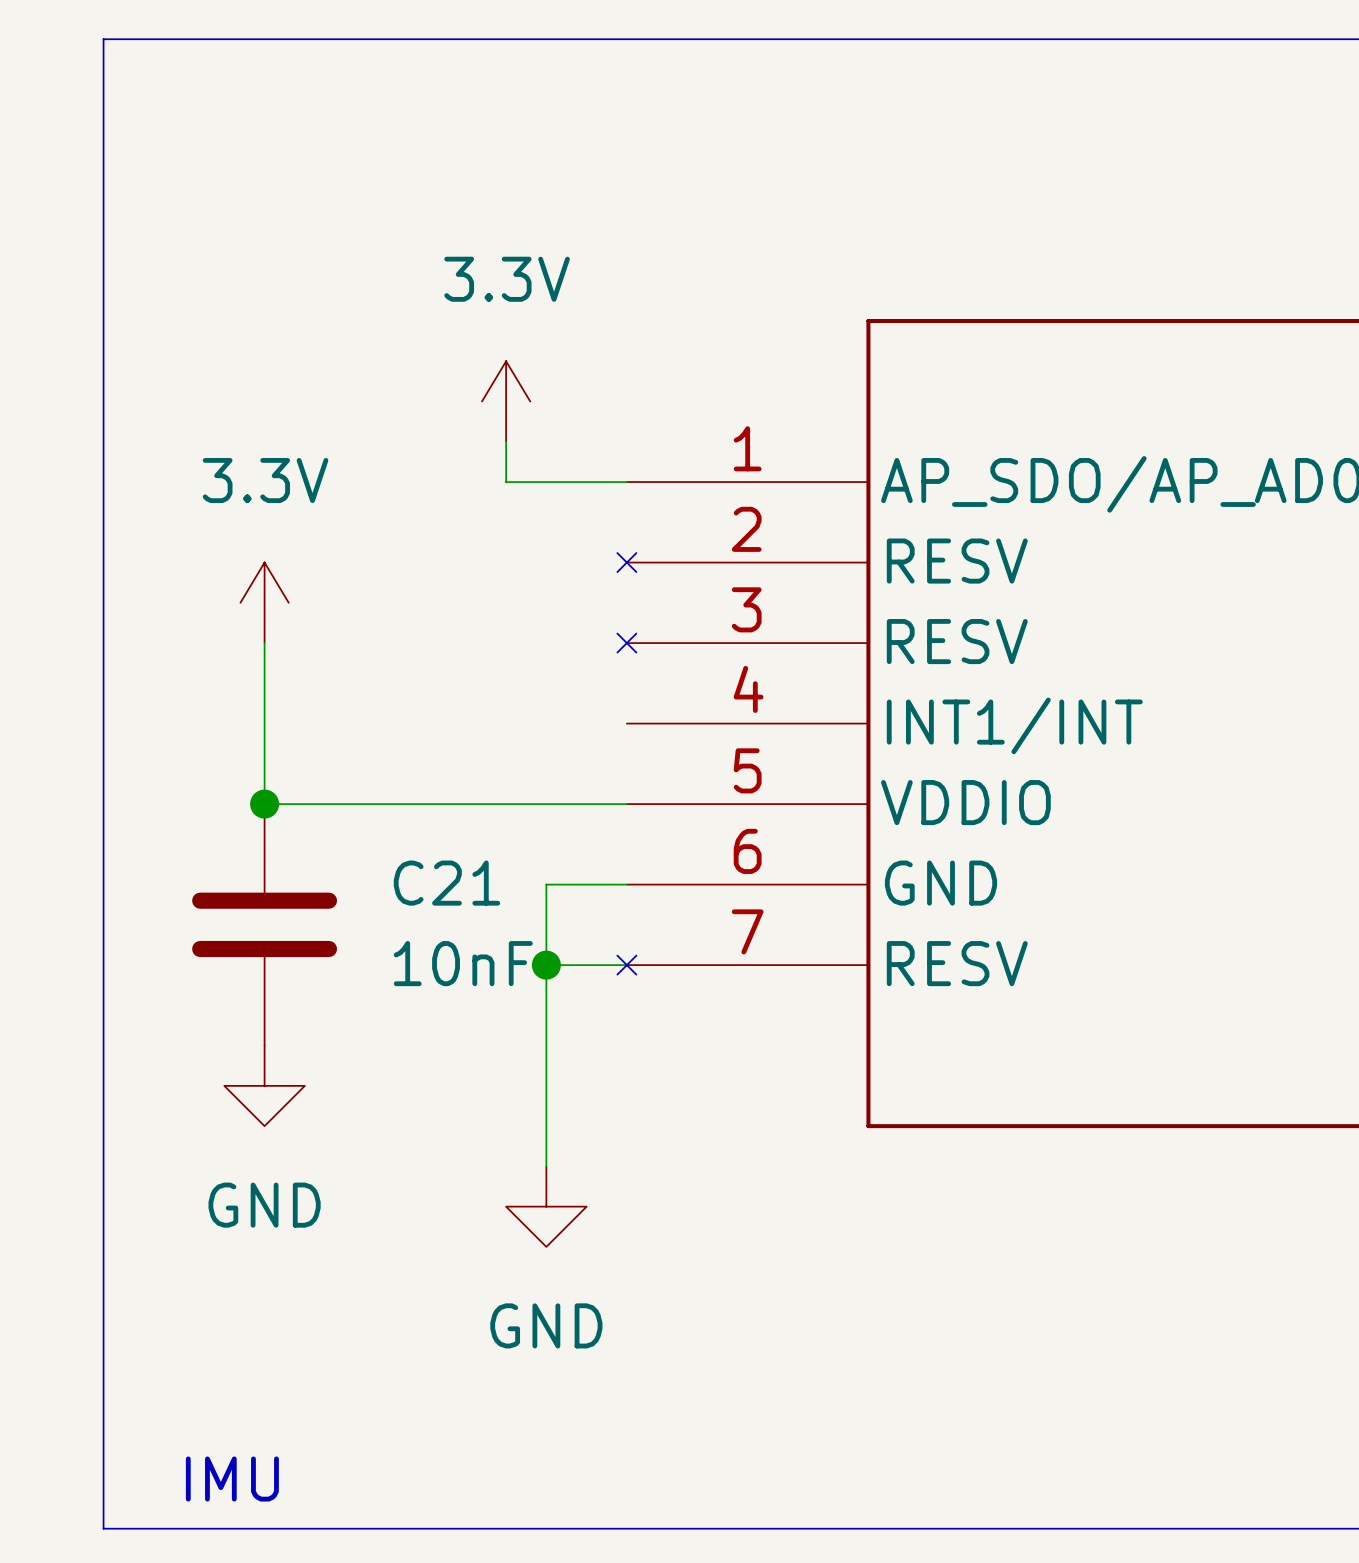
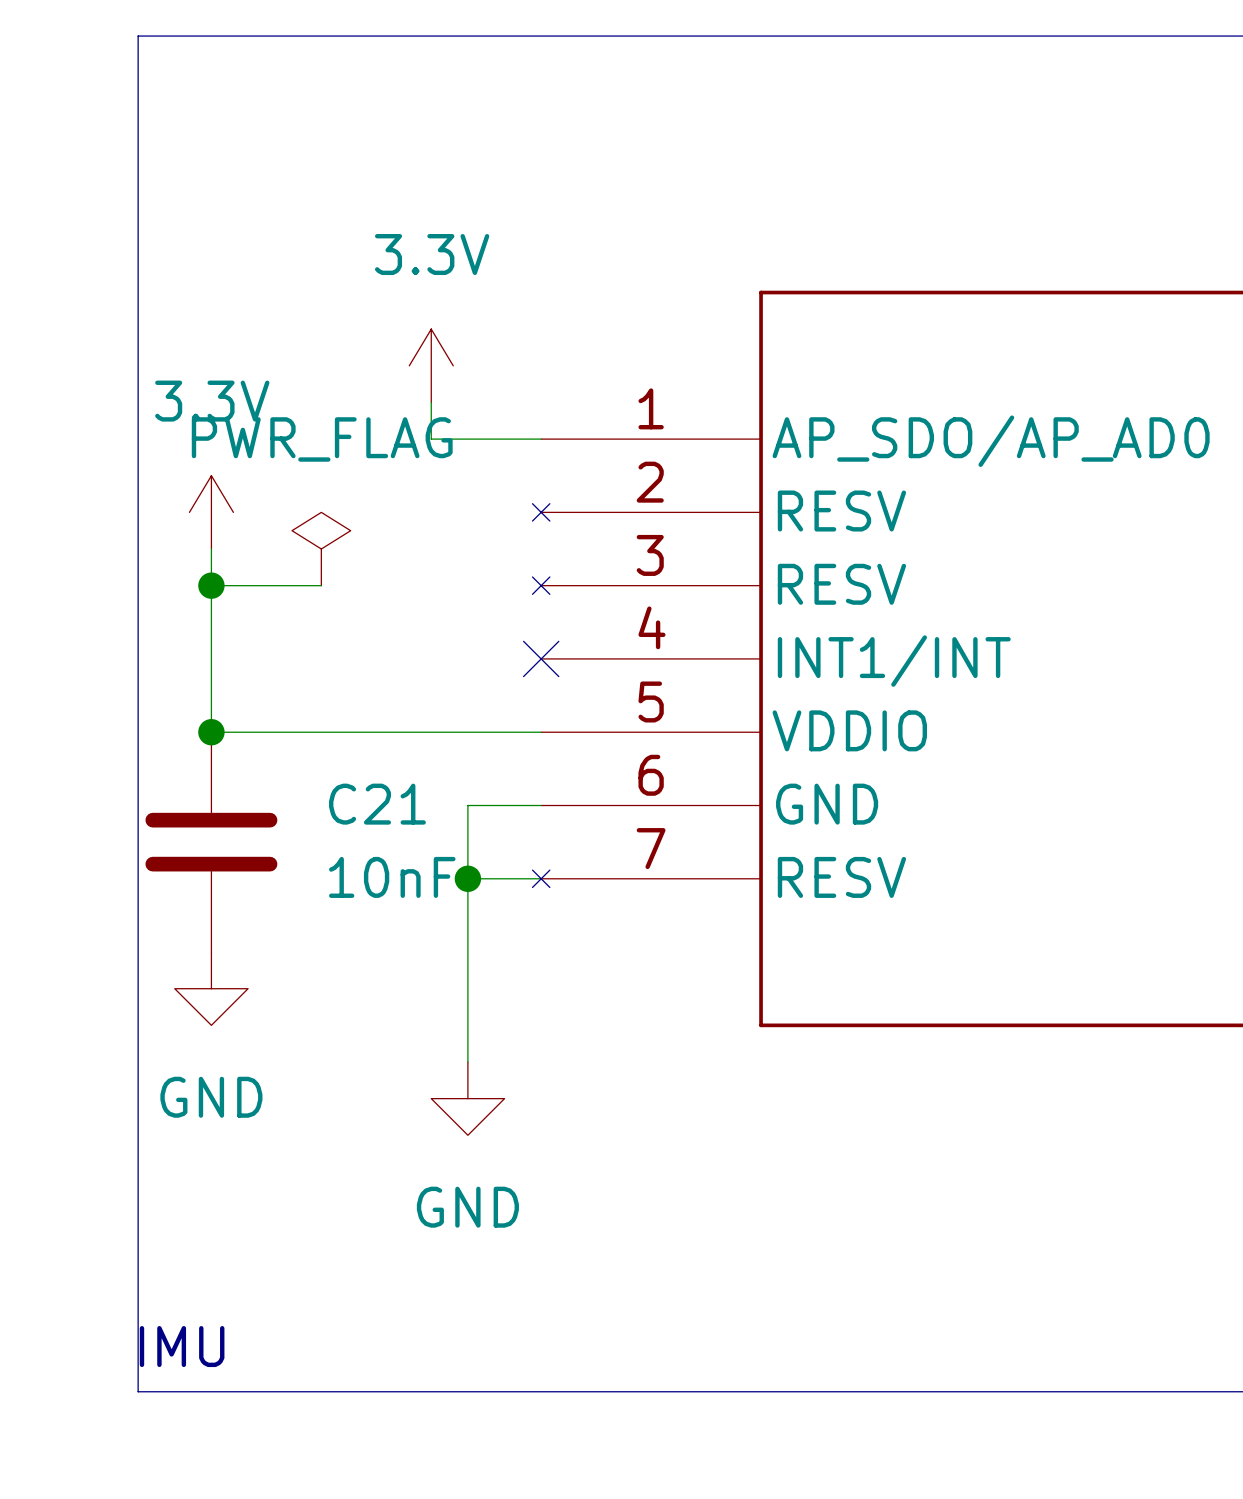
line: (184, 39) (103, 39) (103, 1528) (184, 1528) -> (138, 36) (138, 1391)
wire: none -> (211, 549) (211, 585) (321, 585)
power symbol position: 3.3V (264, 602) -> 3.3V (211, 512)
power symbol: none -> PWR_FLAG (321, 549)
junction: none -> (211, 585)
no-connect mark: none -> (541, 658)

